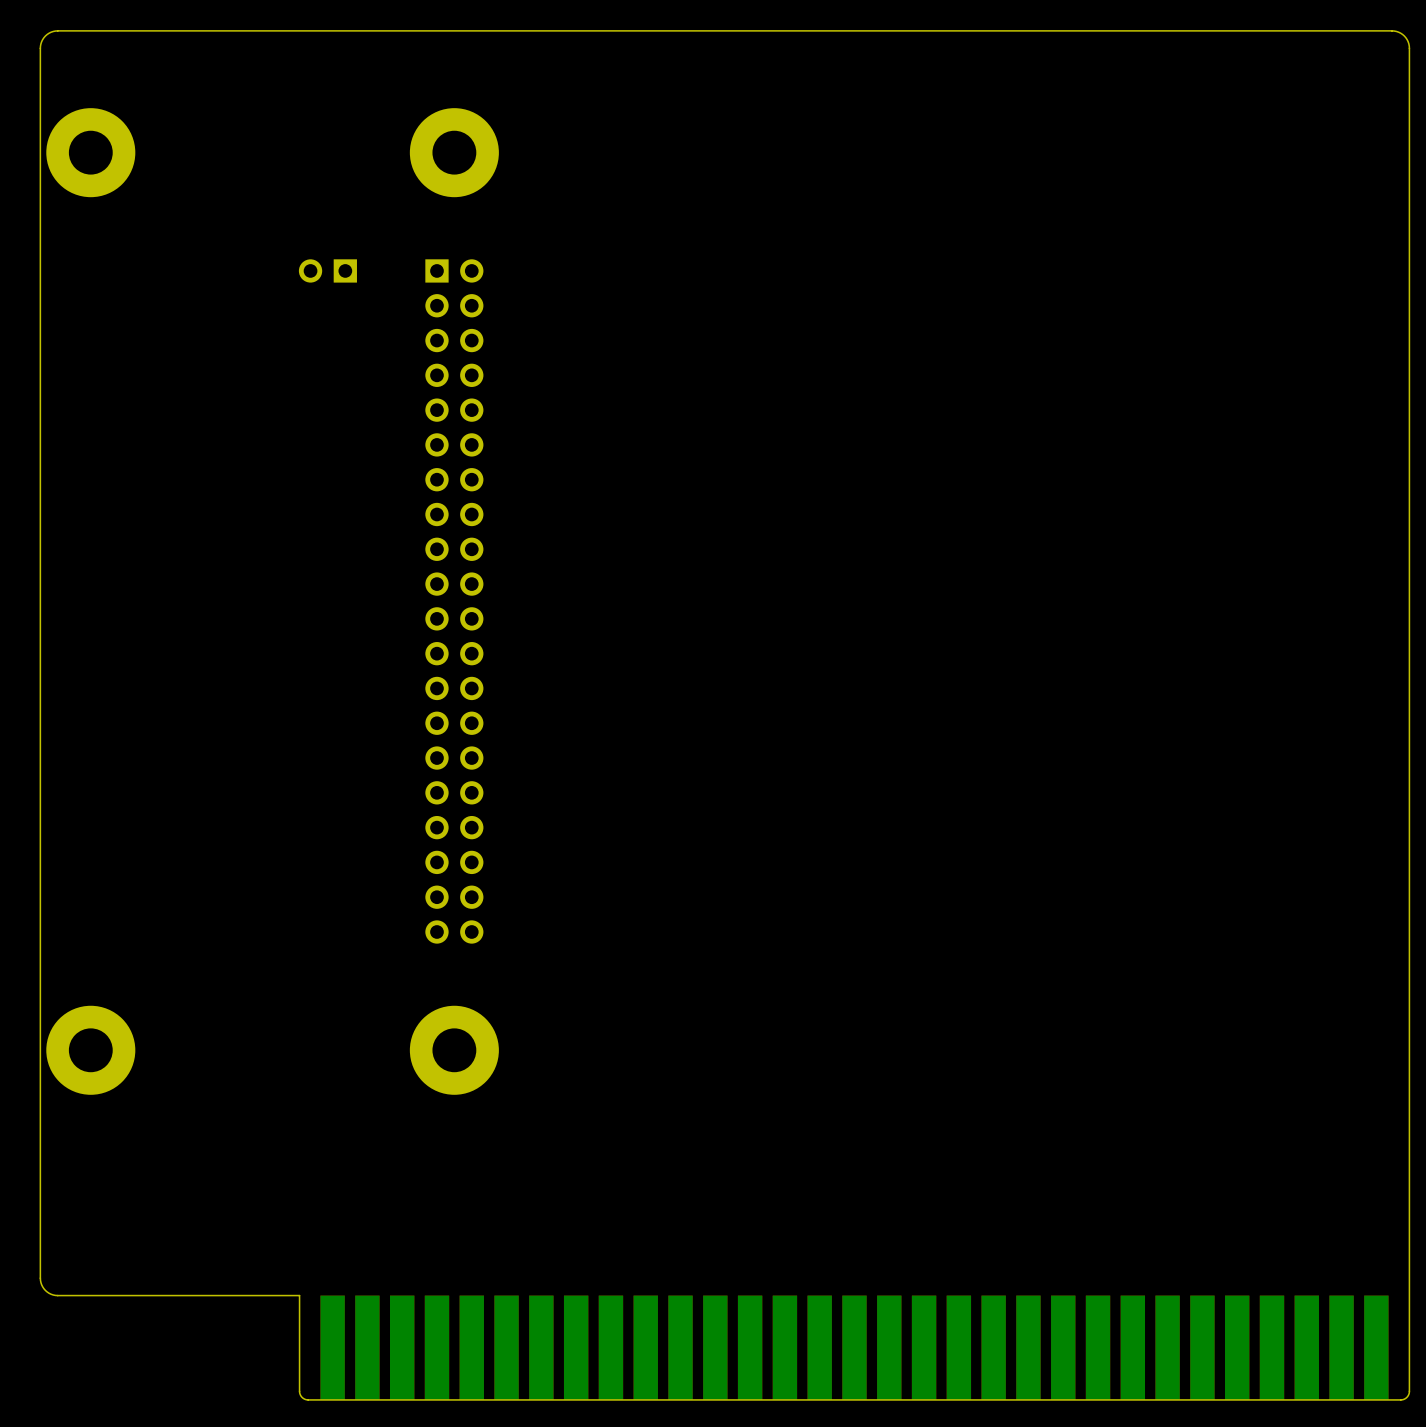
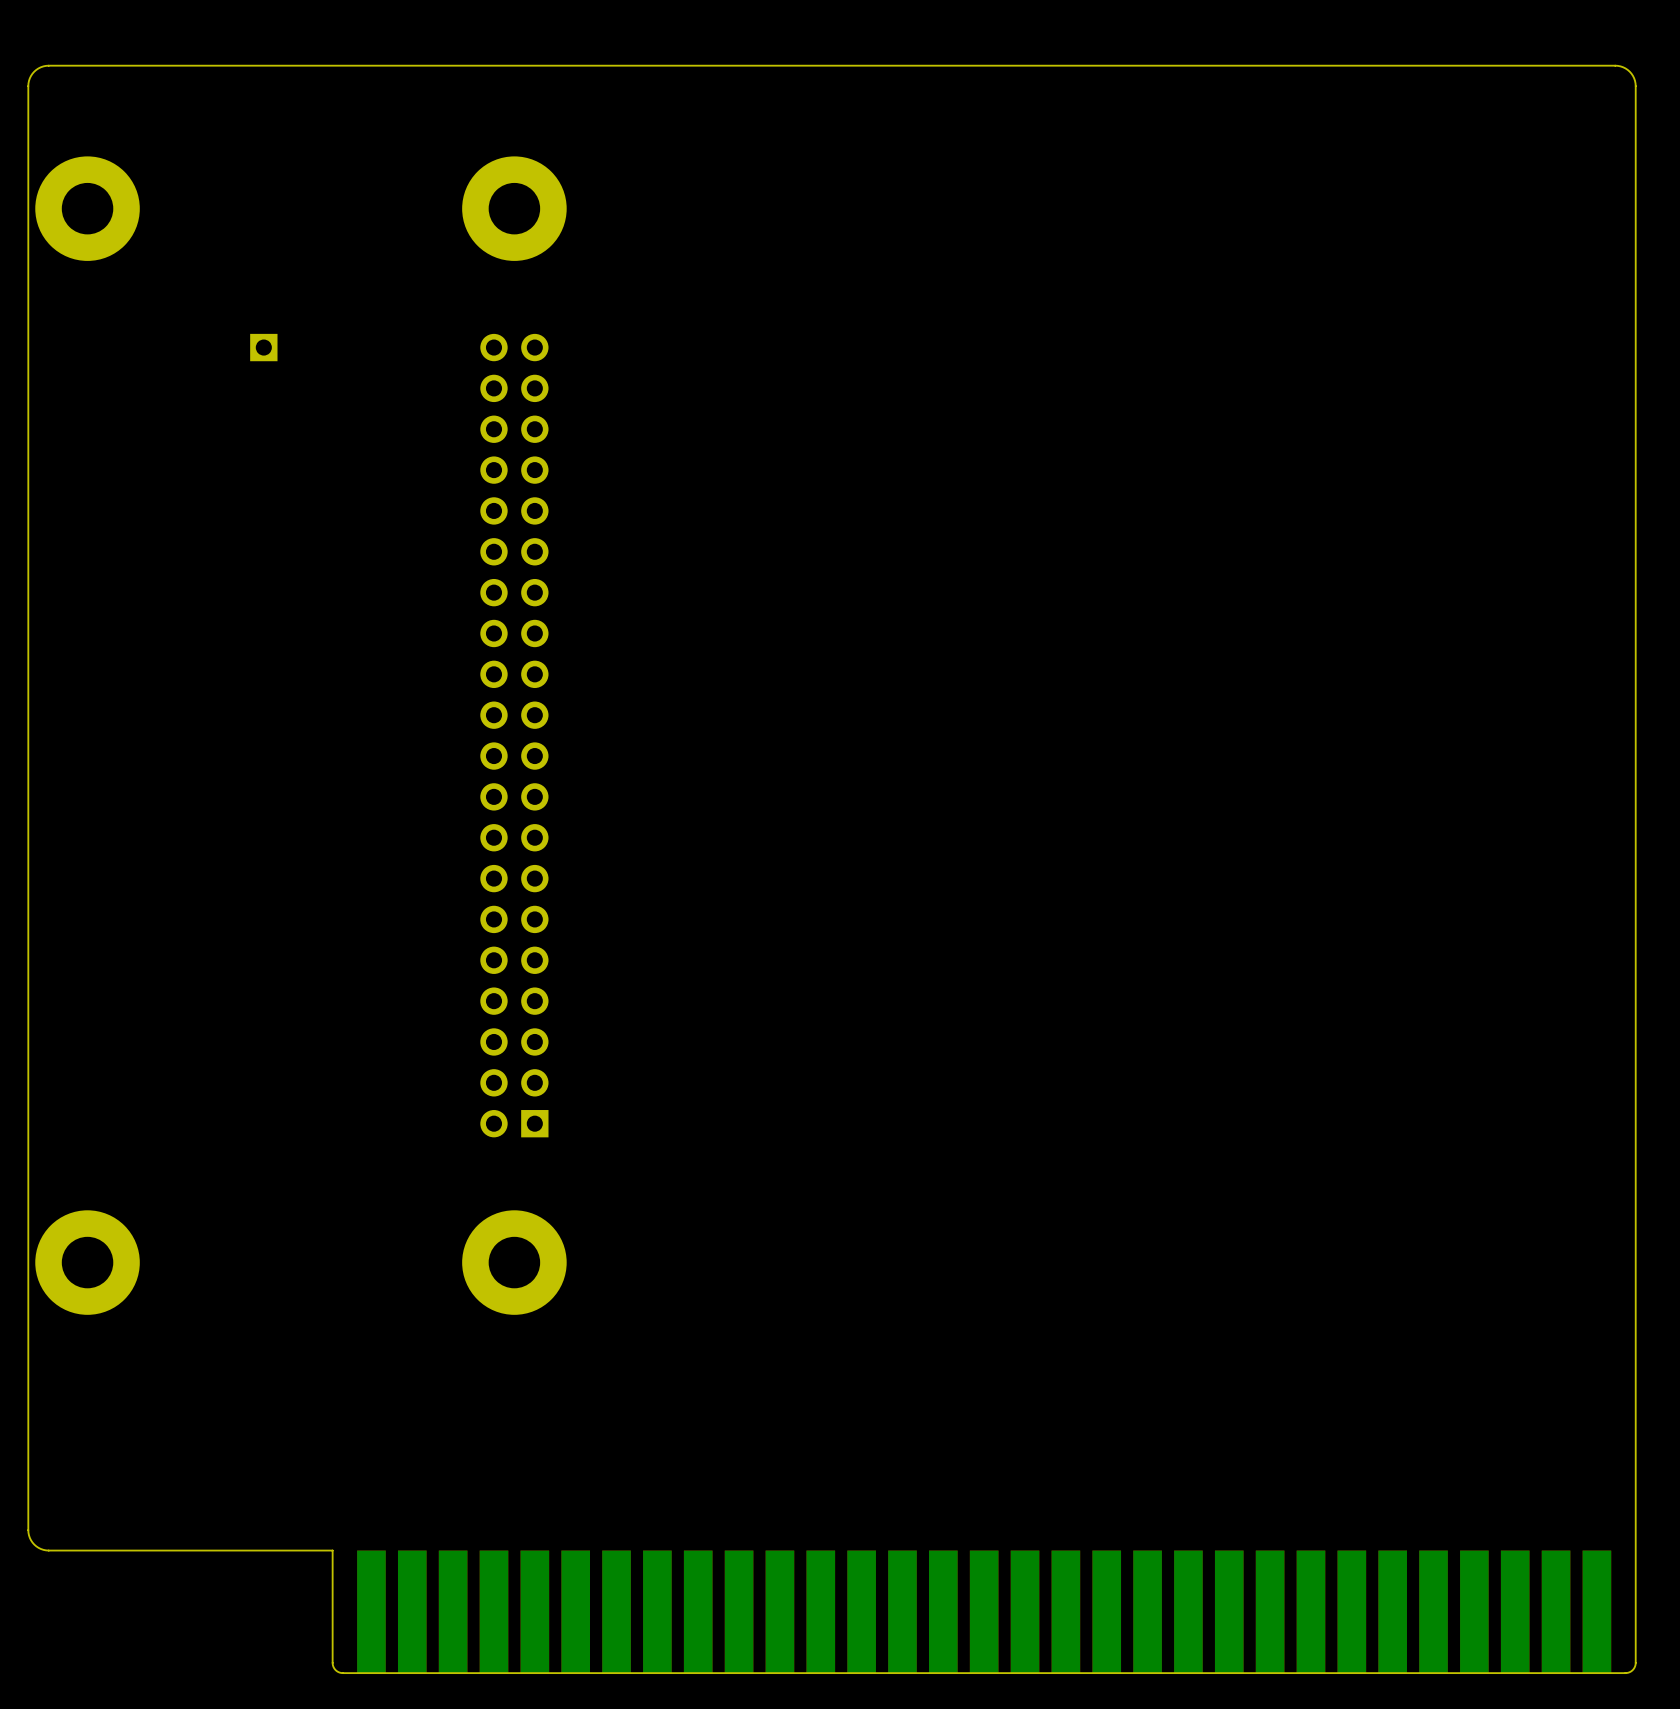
part: none -> (263, 347)
part: (327, 270) -> none
part rotation: 0° (454, 601) -> 180° (514, 735)

